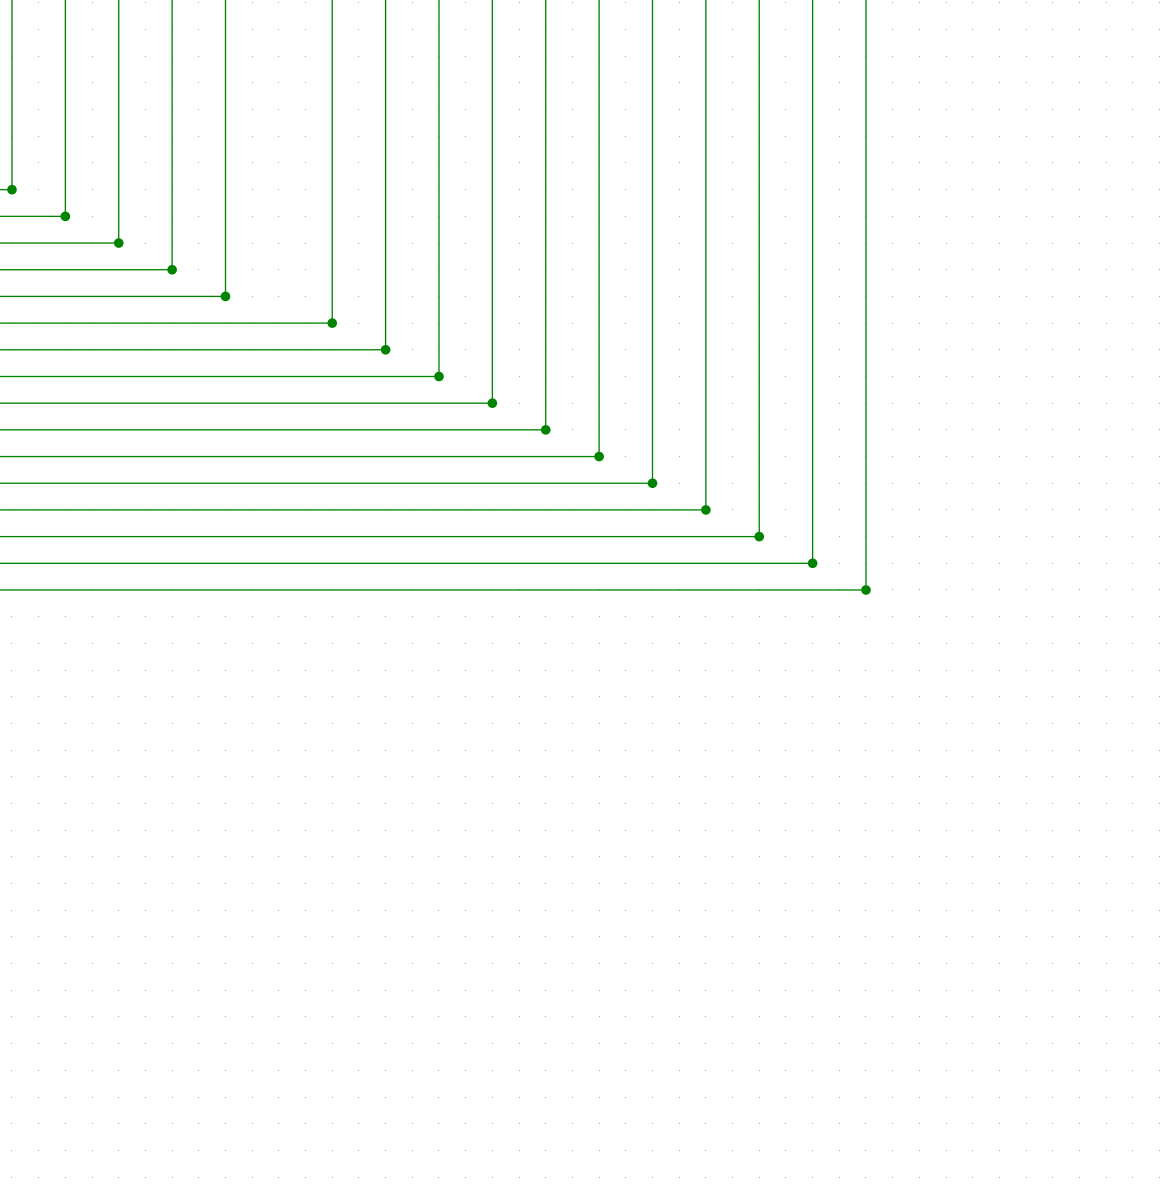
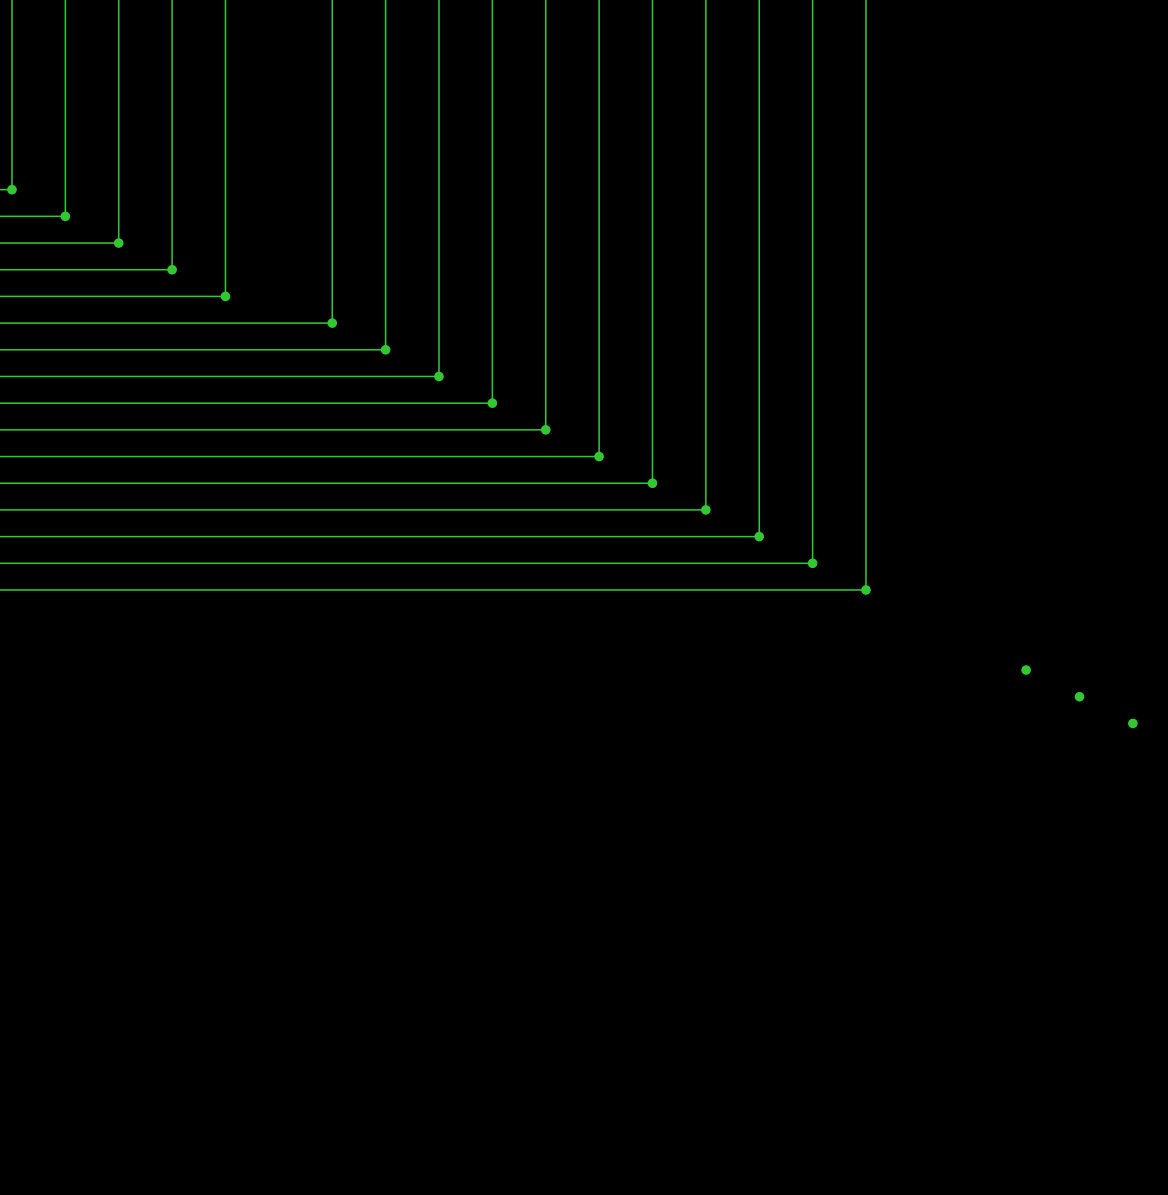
junction: none -> (1026, 670)
junction: none -> (1079, 696)
junction: none -> (1132, 723)

